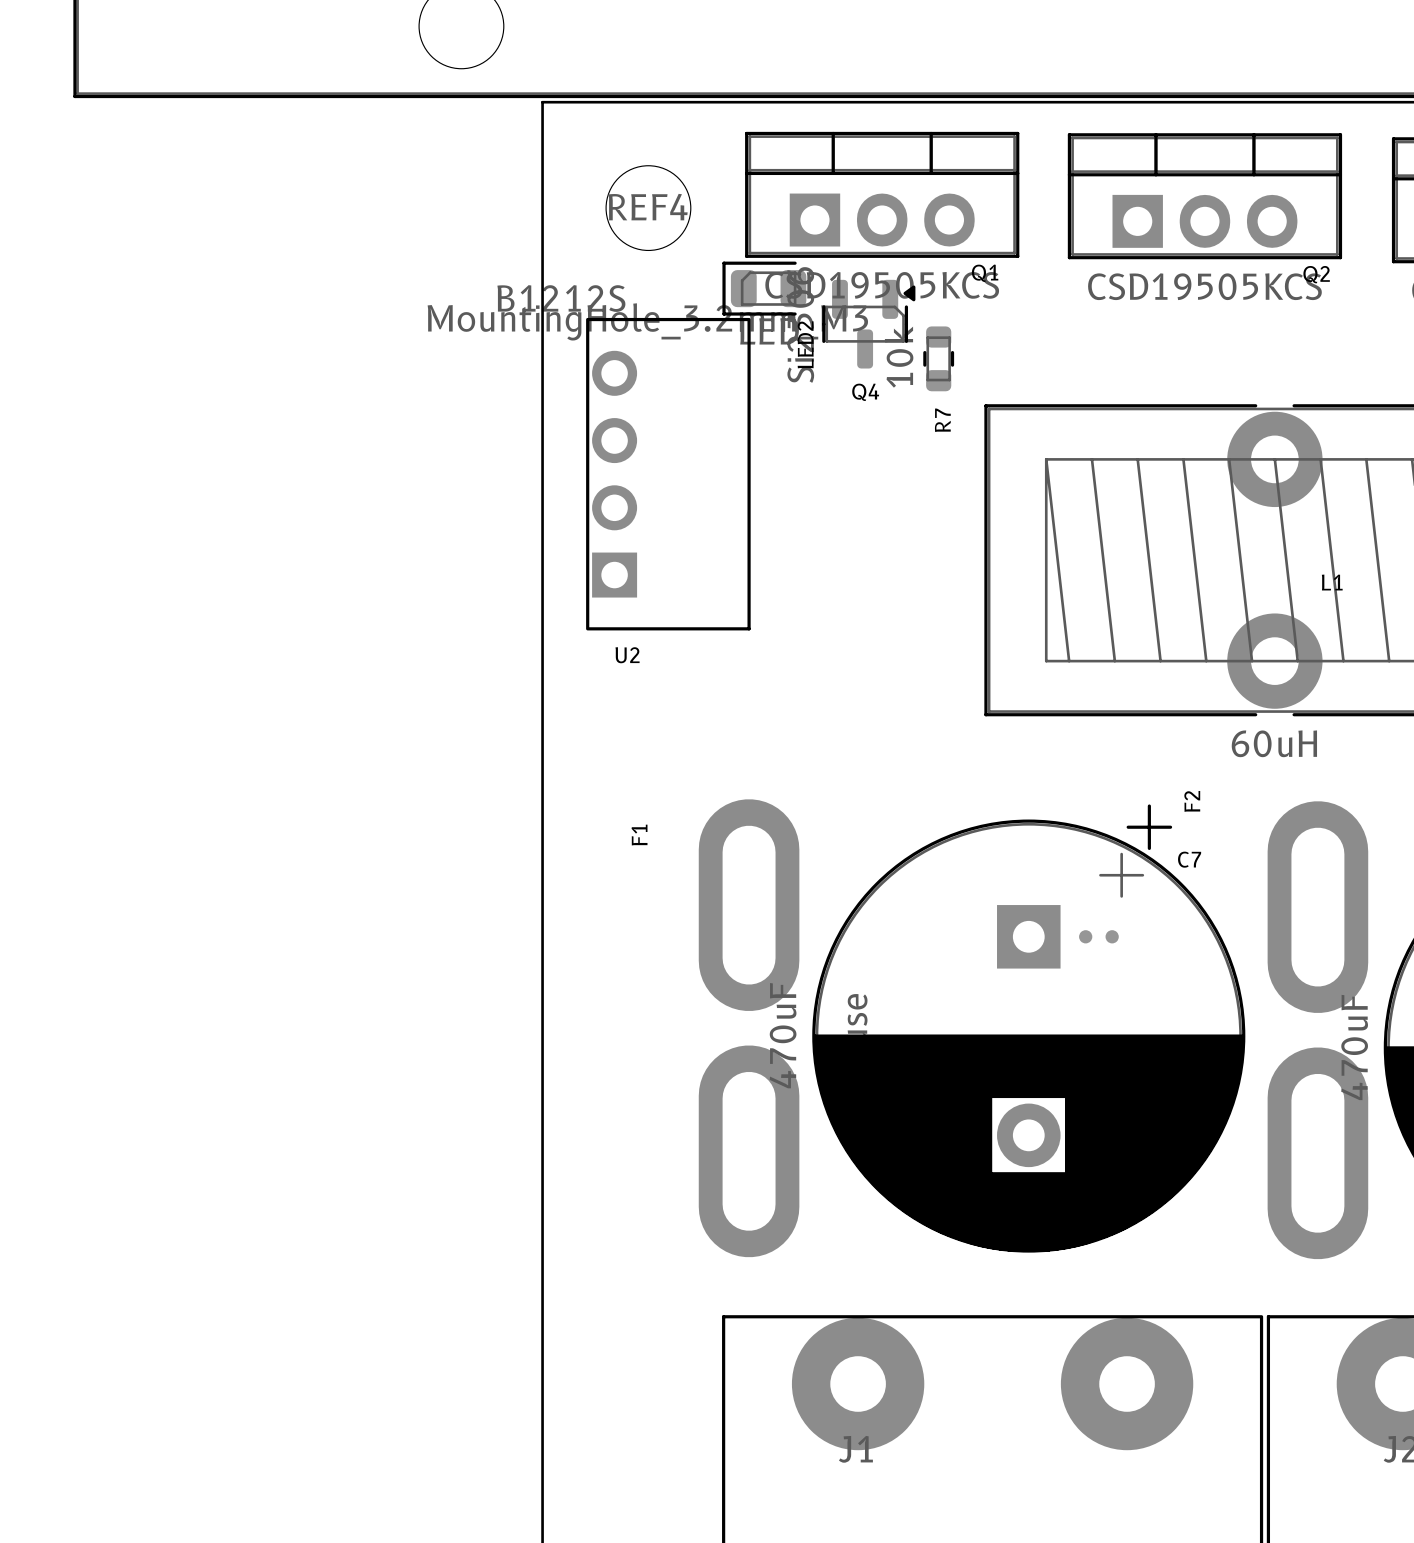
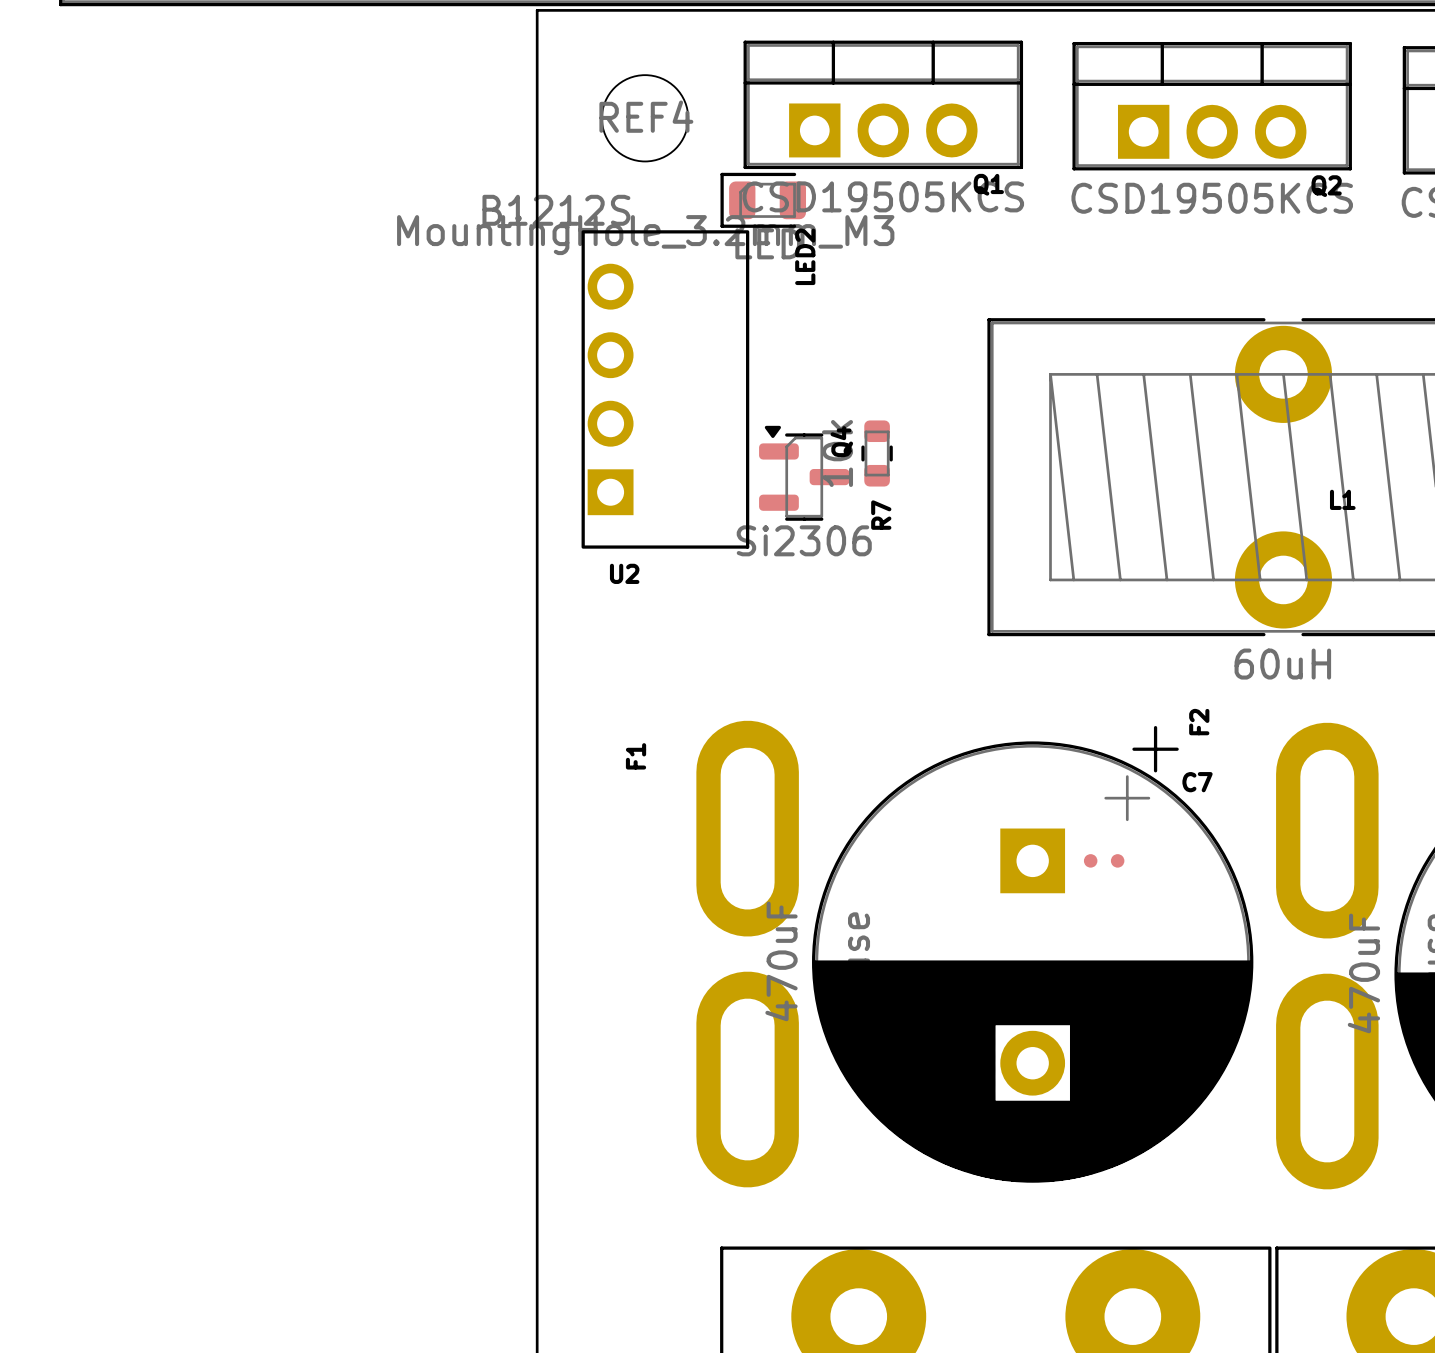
Q4 rotation: 0° (868, 324) -> 90° counterclockwise (804, 473)
Q4 position: (868, 324) -> (804, 473)
R7 position: (938, 358) -> (877, 453)

